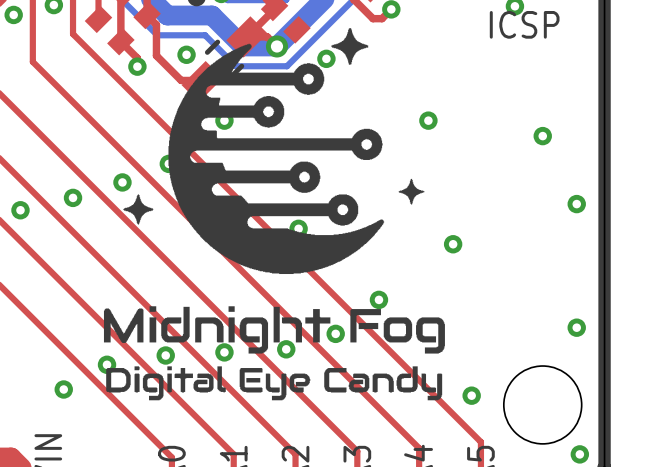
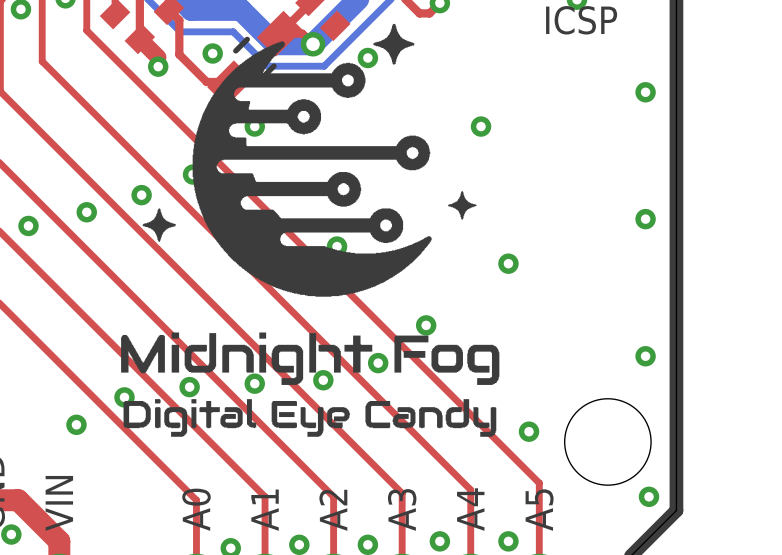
top track width: thin (120, 41) (137, 58) -> thick (139, 38) (158, 57)
via position: (542, 136) -> (645, 92)

